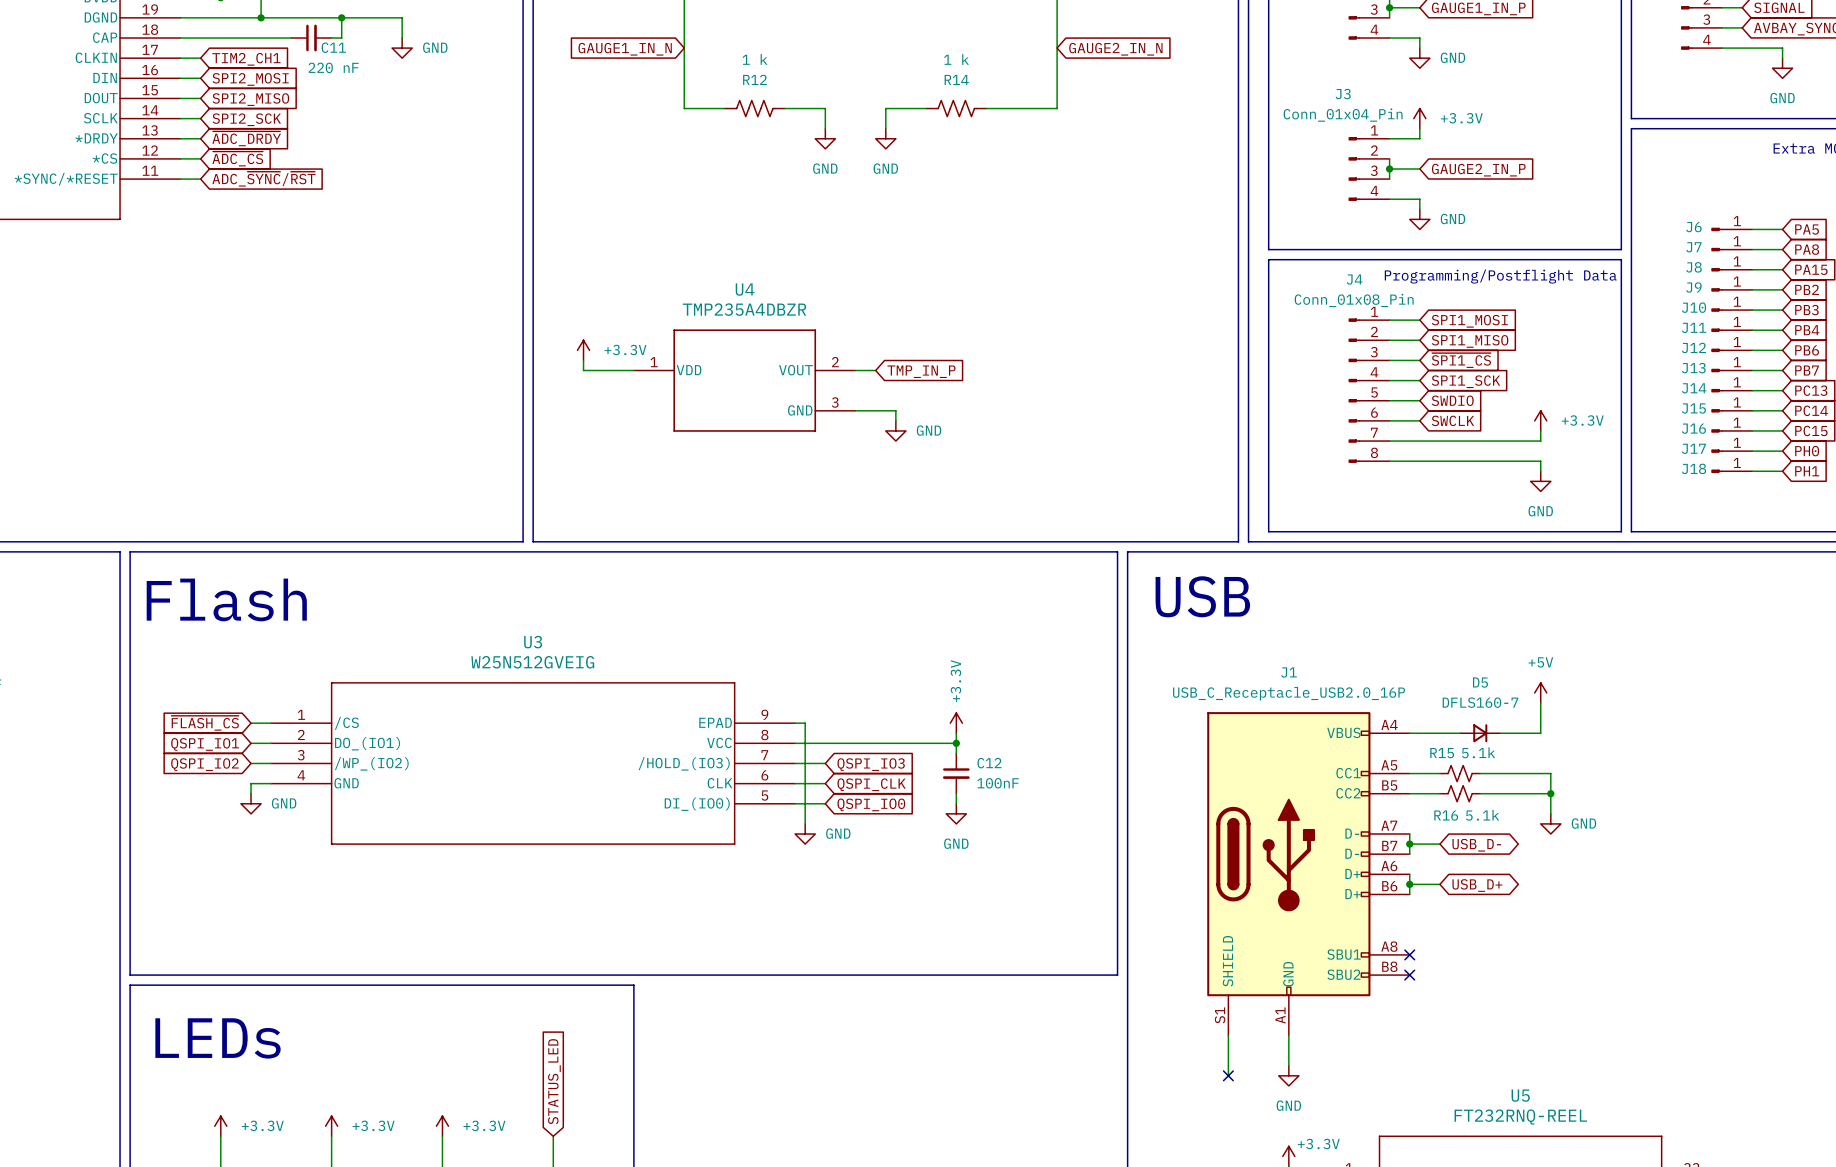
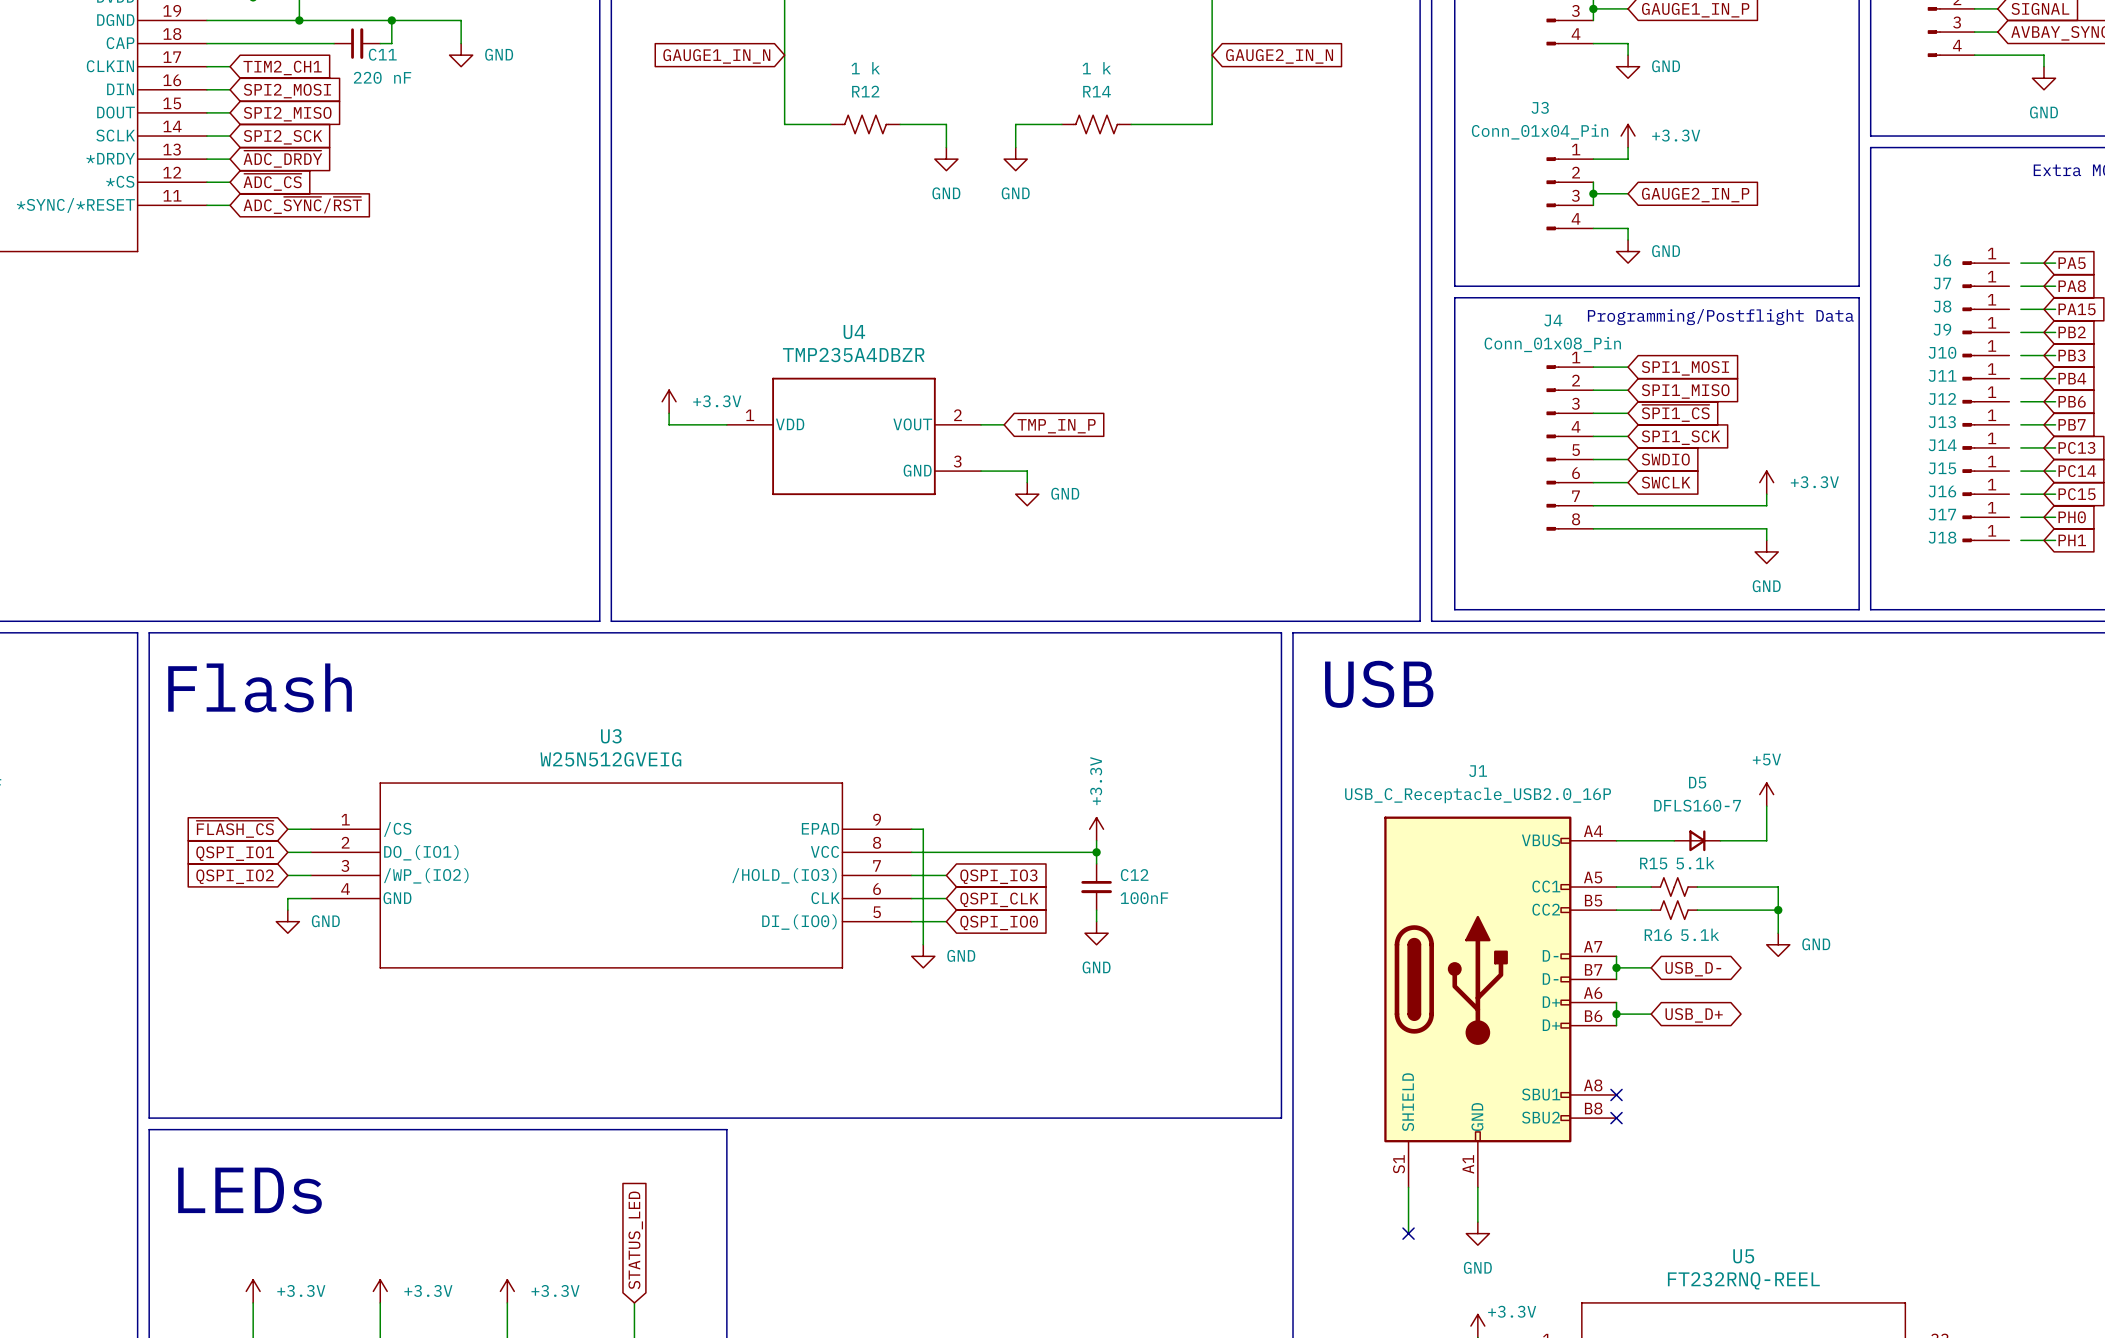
wire: (1752, 229) (1762, 229) -> (2043, 263) (2055, 263)
wire: (1752, 249) (1762, 249) -> (2043, 286) (2055, 286)
wire: (1752, 269) (1762, 269) -> (2043, 309) (2055, 309)
wire: (1752, 289) (1762, 289) -> (2043, 332) (2055, 332)
wire: (1752, 310) (1762, 310) -> (2043, 355) (2055, 355)
wire: (1752, 330) (1762, 330) -> (2043, 378) (2055, 378)
wire: (1752, 350) (1762, 350) -> (2043, 401) (2055, 401)
wire: (1752, 370) (1762, 370) -> (2043, 424) (2055, 424)
wire: (1752, 390) (1762, 390) -> (2043, 447) (2055, 447)
wire: (1752, 410) (1762, 410) -> (2043, 471) (2055, 471)
wire: (1752, 430) (1762, 430) -> (2043, 494) (2055, 494)
wire: (1752, 451) (1762, 451) -> (2043, 517) (2055, 517)
wire: (1752, 471) (1762, 471) -> (2043, 540) (2055, 540)

